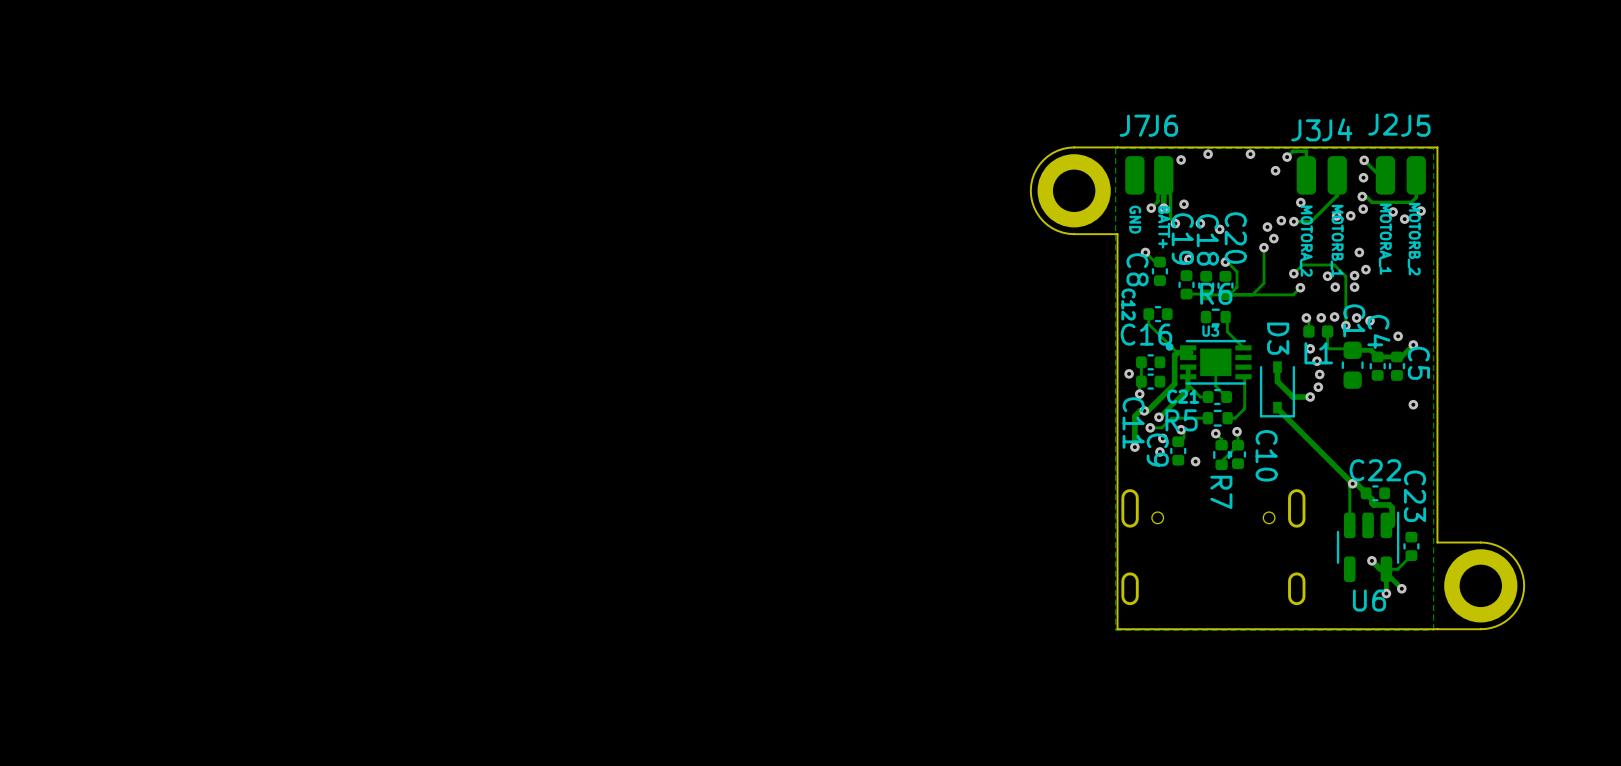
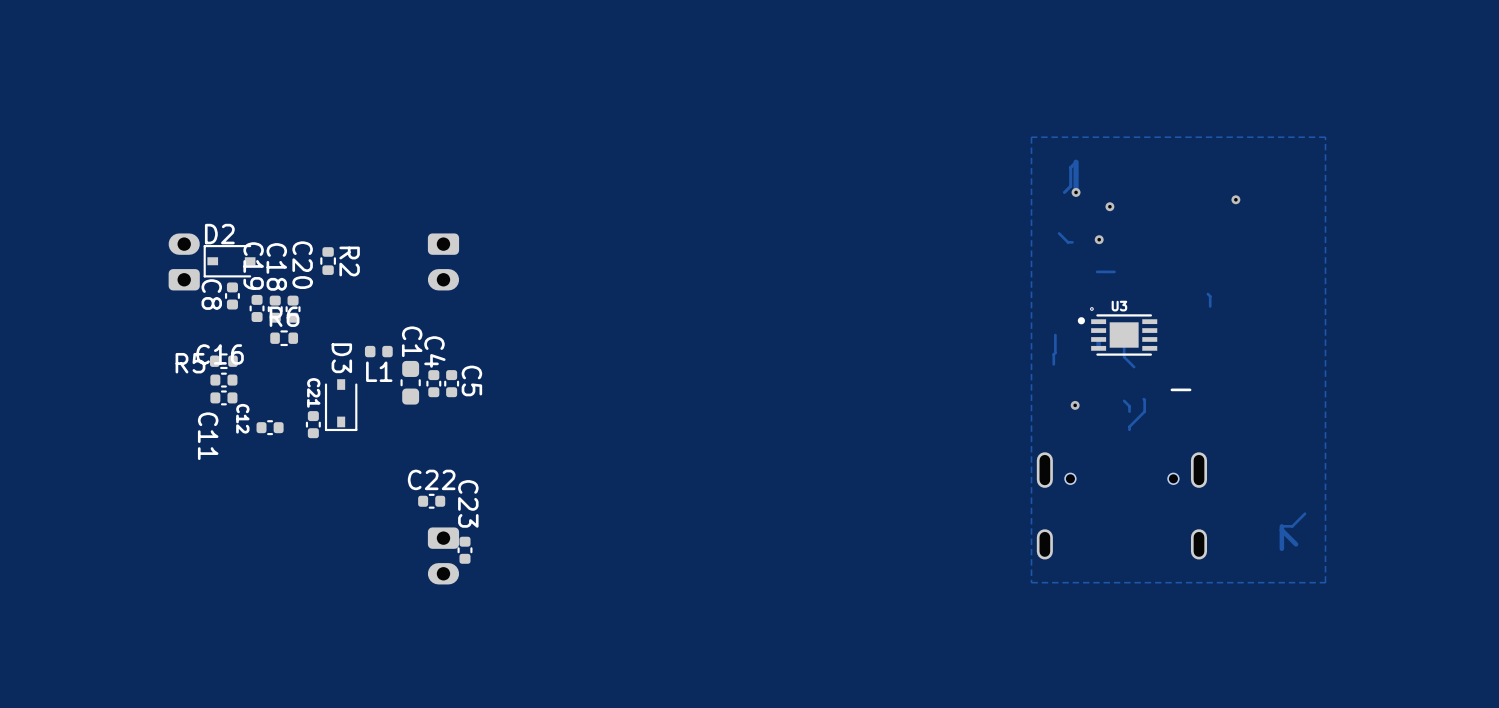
board edge: (1437, 147) (1437, 542) (1486, 542) (1496, 545) (1509, 553) (1519, 565) (1523, 580) (1522, 596) (1516, 610) (1500, 624) (1480, 629) (1117, 629) (1117, 234) (1068, 233) (1047, 225) (1039, 217) (1032, 202) (1031, 185) (1036, 169) (1052, 153) (1074, 147) (1437, 147) -> none
via: (1208, 154) -> none
via: (1250, 154) -> none
track: (1287, 157) (1292, 151) (1306, 151) (1306, 175) -> none
via: (1287, 157) -> none
via: (1181, 159) -> none
track: (1364, 160) (1379, 175) (1385, 175) -> none
via: (1364, 160) -> none
via: (1275, 170) -> none
J7: GND (1134, 175) -> none
track: (1163, 175) (1170, 182) (1170, 218) (1175, 223) -> none
J6: BATT+ (1163, 175) -> none
J3: MOTORA_2 (1306, 175) -> none
track: (1337, 175) (1337, 195) (1311, 221) (1293, 221) -> none
J4: MOTORB_1 (1337, 175) -> none
J2: MOTORA_1 (1385, 175) -> none
track: (1416, 175) (1416, 197) (1411, 202) (1371, 202) (1366, 196) (1362, 196) -> none
J5: MOTORB_2 (1416, 175) -> none
via: (1363, 177) -> none
part: (1074, 190) -> none
via: (1362, 196) -> none
via: (1300, 202) -> none
via: (1184, 204) -> none
via: (1151, 208) -> none
via: (1363, 209) -> none
via: (1421, 211) -> none
via: (1393, 212) -> none
via: (1350, 215) -> none
via: (1404, 219) -> none
via: (1281, 220) -> none
via: (1293, 221) -> none
via: (1175, 223) -> none
via: (1267, 227) -> none
via: (1219, 229) -> none
via: (1273, 238) -> none
track: (1264, 247) (1264, 283) (1252, 294) -> none
via: (1264, 247) -> none
via: (1145, 252) -> none
via: (1359, 252) -> none
track: (1225, 262) (1237, 271) (1237, 287) (1229, 294) -> none
via: (1225, 262) -> none
via: (1365, 269) -> none
C8 position: (1159, 271) -> (232, 295)
track: (1293, 273) (1302, 265) (1334, 265) (1345, 276) (1345, 325) -> none
via: (1293, 273) -> none
via: (1354, 275) -> none
via: (1327, 276) -> none
D2: none -> (229, 261)
R2: none -> (328, 261)
part: none -> (184, 261)
part: none -> (443, 261)
C19 position: (1186, 284) -> (257, 308)
C18 position: (1206, 285) -> (275, 309)
C20 position: (1225, 285) -> (293, 309)
track: (1300, 287) (1293, 294) (1206, 294) -> none
via: (1300, 287) -> none
via: (1335, 287) -> none
via: (1354, 287) -> none
track: (1148, 314) (1148, 324) (1177, 352) -> none
C12 position: (1158, 314) -> (270, 427)
via: (1334, 316) -> none
R6 position: (1215, 317) -> (284, 338)
track: (1225, 317) (1227, 318) (1227, 331) (1243, 347) -> none
via: (1306, 317) -> none
via: (1321, 317) -> none
via: (1356, 317) -> none
via: (1369, 320) -> none
via: (1345, 325) -> none
L1 position: (1318, 331) -> (378, 351)
track: (1327, 331) (1327, 346) (1329, 348) (1371, 350) (1377, 356) (1401, 356) (1413, 344) -> none
drawing: none -> [1090, 307, 1094, 311]
via: (1398, 336) -> none
via: (1413, 344) -> none
via: (1310, 348) -> none
track: (1177, 352) (1174, 355) (1174, 384) (1147, 410) (1140, 410) (1134, 416) (1134, 447) -> none
track: (1190, 352) (1177, 352) -> none
via: (1316, 361) -> none
C16 position: (1150, 362) -> (223, 380)
C1 position: (1352, 365) -> (410, 382)
C4 position: (1377, 366) -> (433, 383)
C5 position: (1396, 366) -> (451, 383)
track: (1277, 367) (1277, 381) (1292, 397) (1310, 397) -> none
via: (1129, 373) -> none
via: (1319, 374) -> none
track: (1243, 376) (1244, 408) (1235, 418) (1227, 418) -> none
C11 position: (1150, 381) -> (223, 397)
via: (1318, 387) -> none
D3 position: (1277, 389) -> (341, 405)
via: (1139, 394) -> none
track: (1208, 397) (1200, 397) (1186, 383) (1186, 378) (1188, 376) (1187, 377) (1187, 389) (1158, 417) -> none
C21 rotation: 0° (1217, 397) -> 90° clockwise (313, 424)
C21 position: (1217, 397) -> (313, 424)
via: (1310, 397) -> none
via: (1413, 404) -> none
track: (1277, 407) (1352, 483) -> none
via: (1144, 410) -> none
via: (1158, 417) -> none
track: (1207, 418) (1171, 418) (1161, 427) (1150, 427) -> none
R5 position: (1217, 418) -> (223, 361)
line: none -> (1190, 389) (1171, 389)
via: (1150, 427) -> none
track: (1181, 429) (1184, 432) (1184, 438) -> none
via: (1181, 429) -> none
via: (1237, 431) -> none
via: (1215, 433) -> none
via: (1134, 447) -> none
C9: (1178, 450) -> none
via: (1159, 451) -> none
C10: (1237, 454) -> none
R7: (1221, 455) -> none
via: (1195, 461) -> none
track: (1352, 483) (1349, 486) (1349, 525) -> none
track: (1352, 483) (1356, 483) (1371, 499) (1373, 504) (1389, 504) (1392, 507) (1392, 525) -> none
via: (1352, 483) -> none
C22 position: (1375, 493) -> (431, 501)
U6: (1368, 546) -> none
C23 position: (1411, 546) -> (465, 550)
track: (1371, 560) (1380, 569) -> none
via: (1371, 560) -> none
part: (1480, 585) -> none
via: (1401, 588) -> none
via: (1386, 593) -> none
part: none -> (443, 555)

